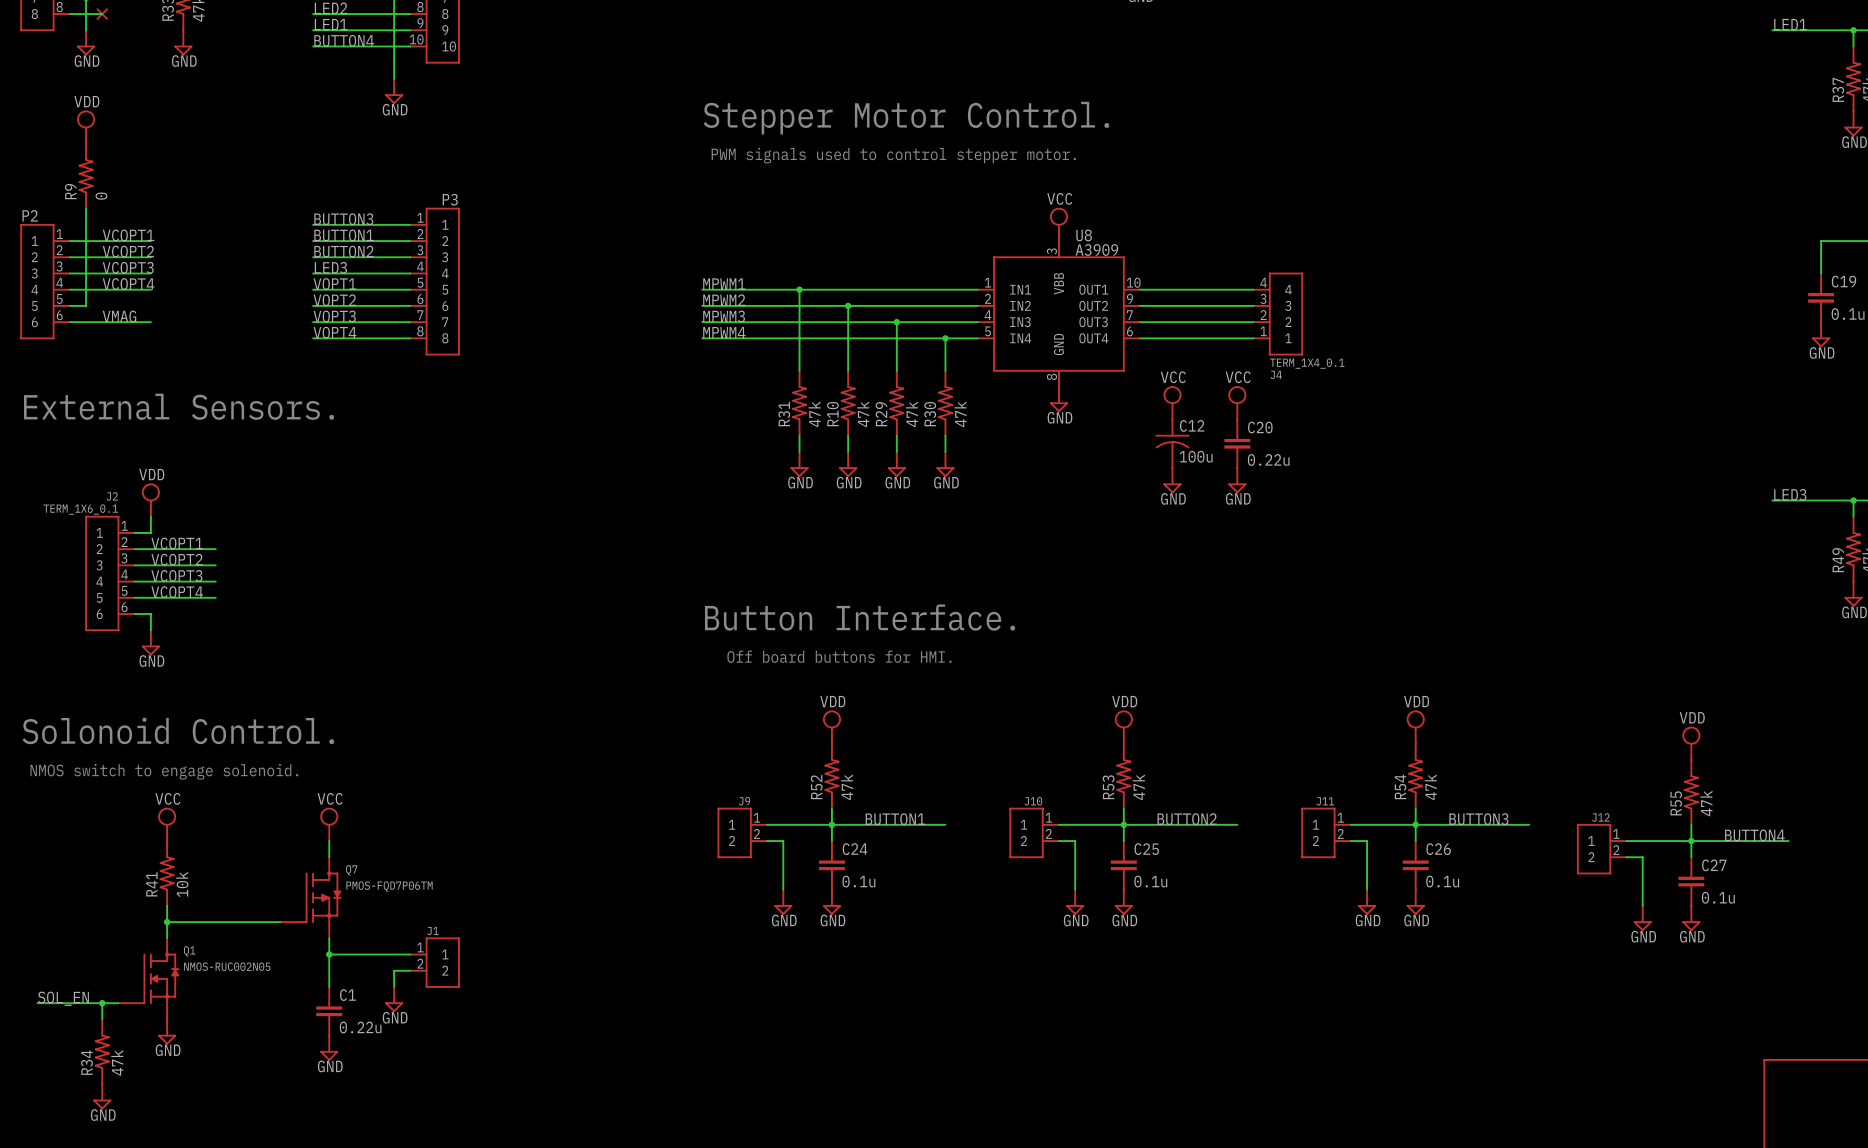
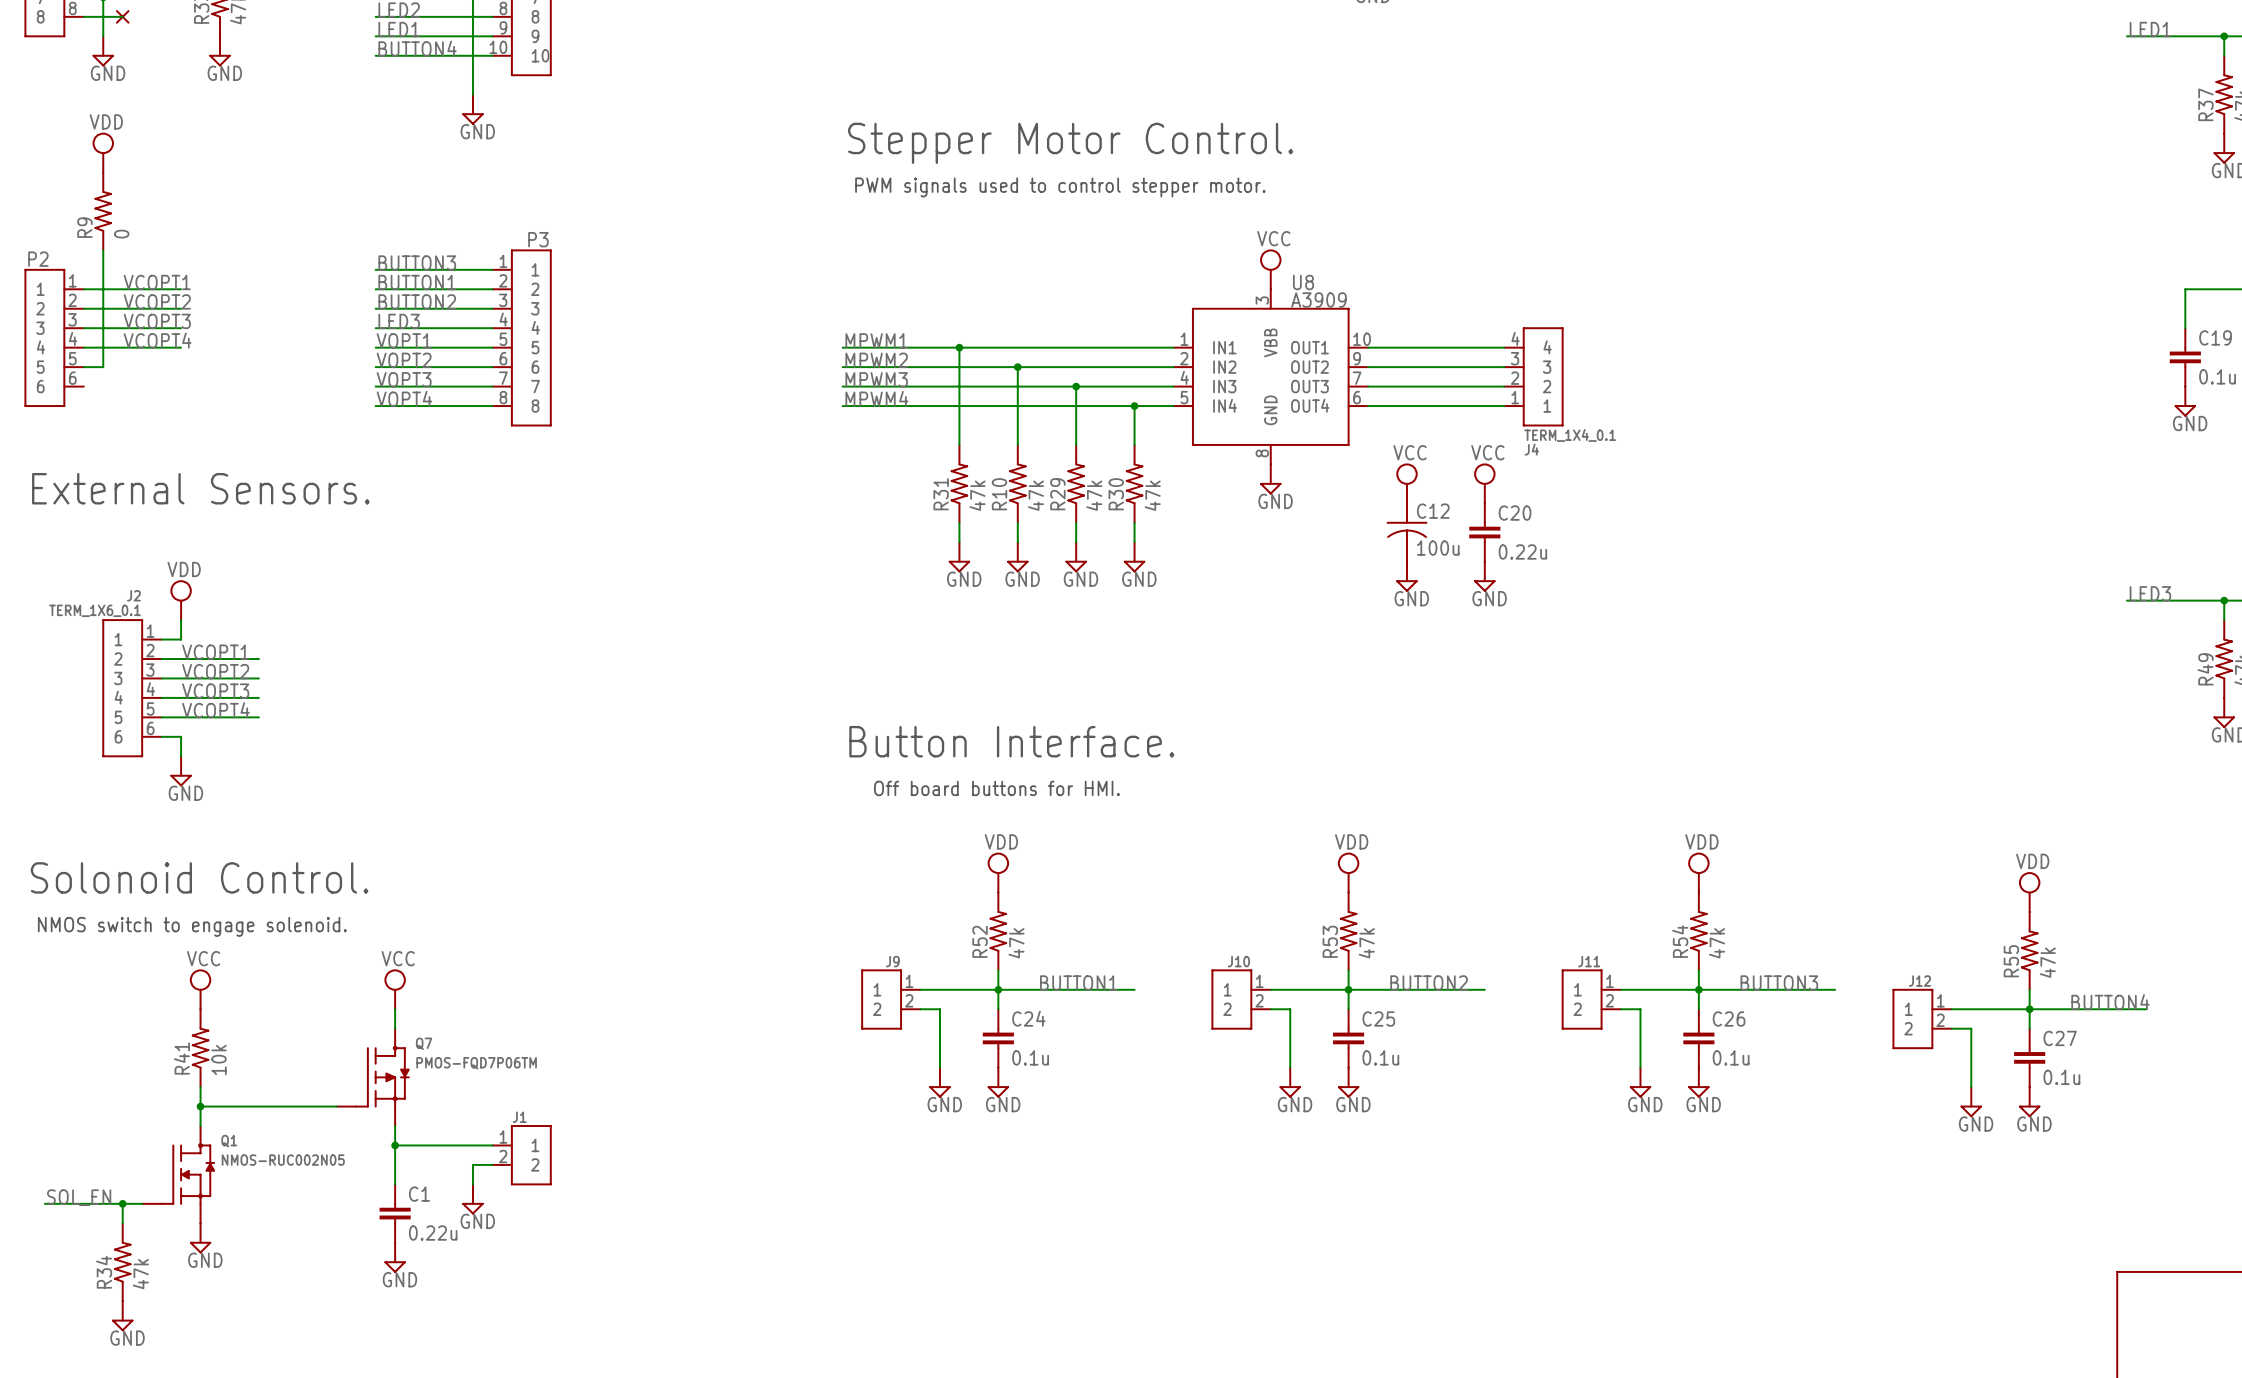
label: VMAG (119, 316) -> none
wire: (69, 322) (150, 322) -> none

